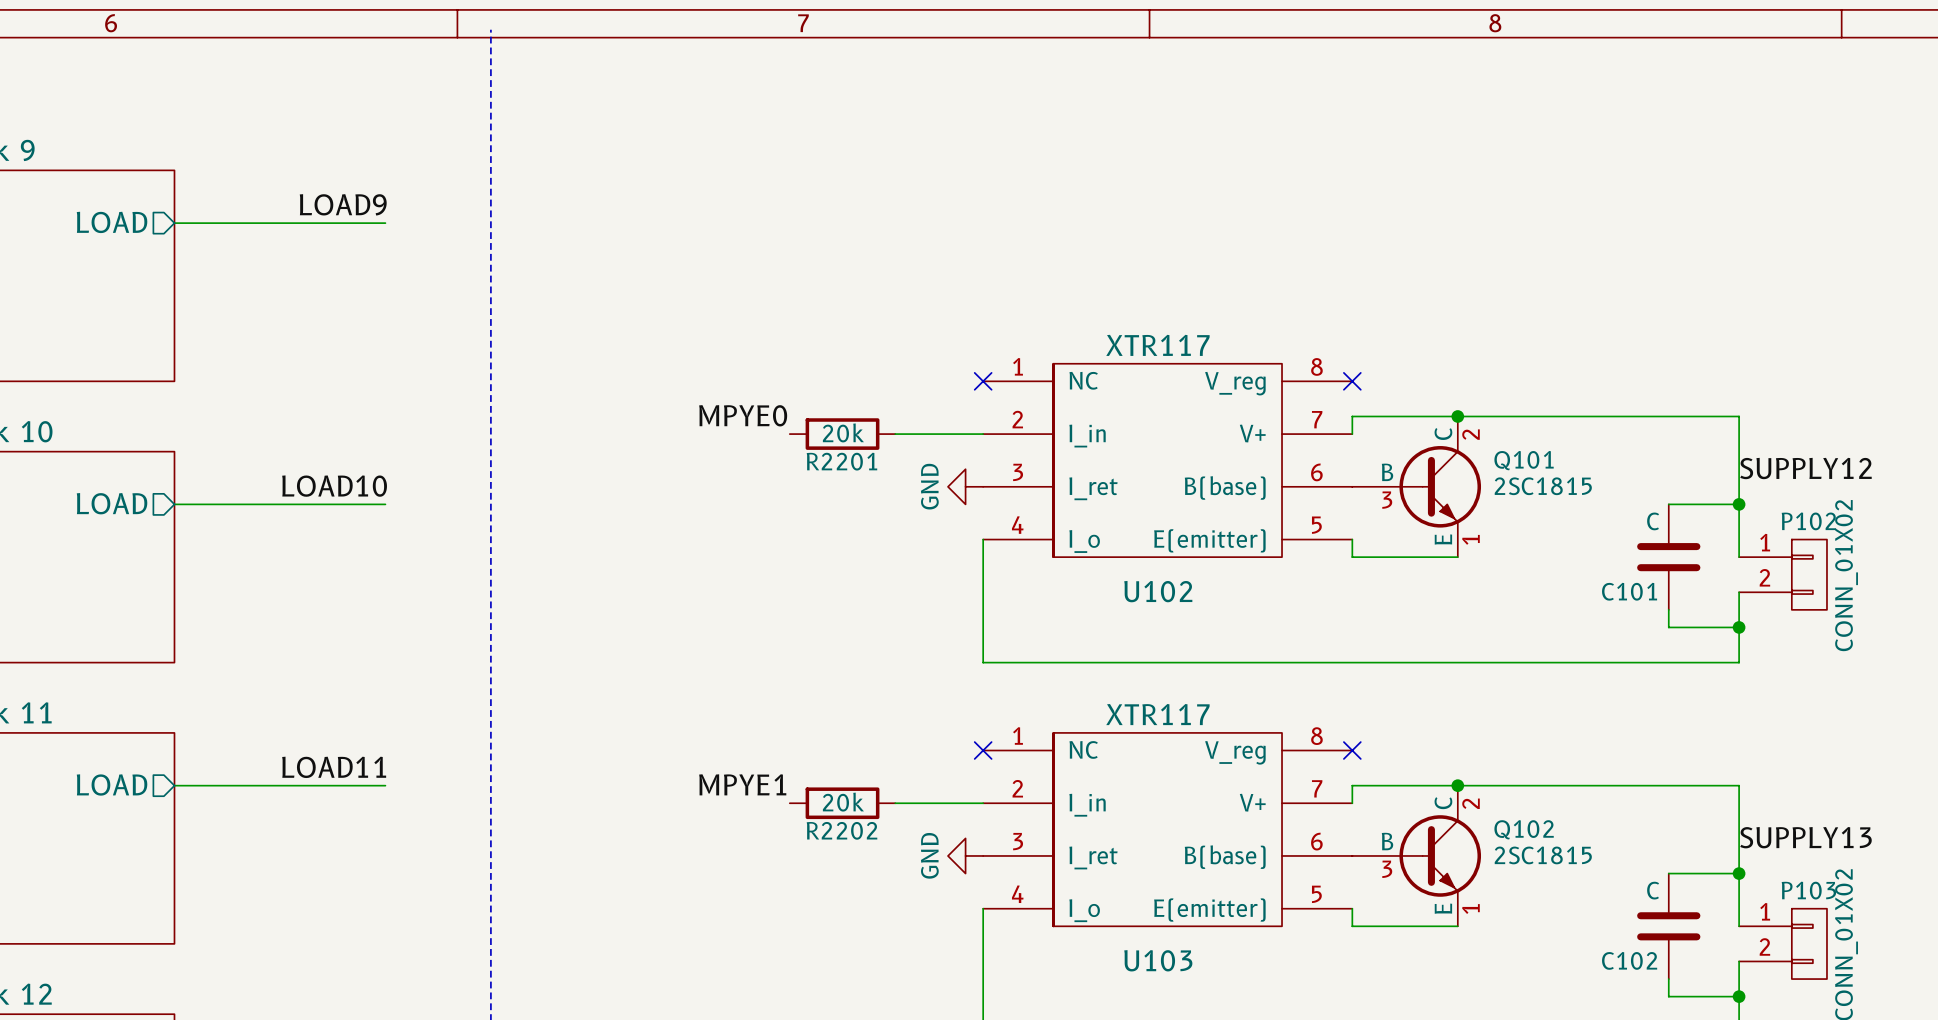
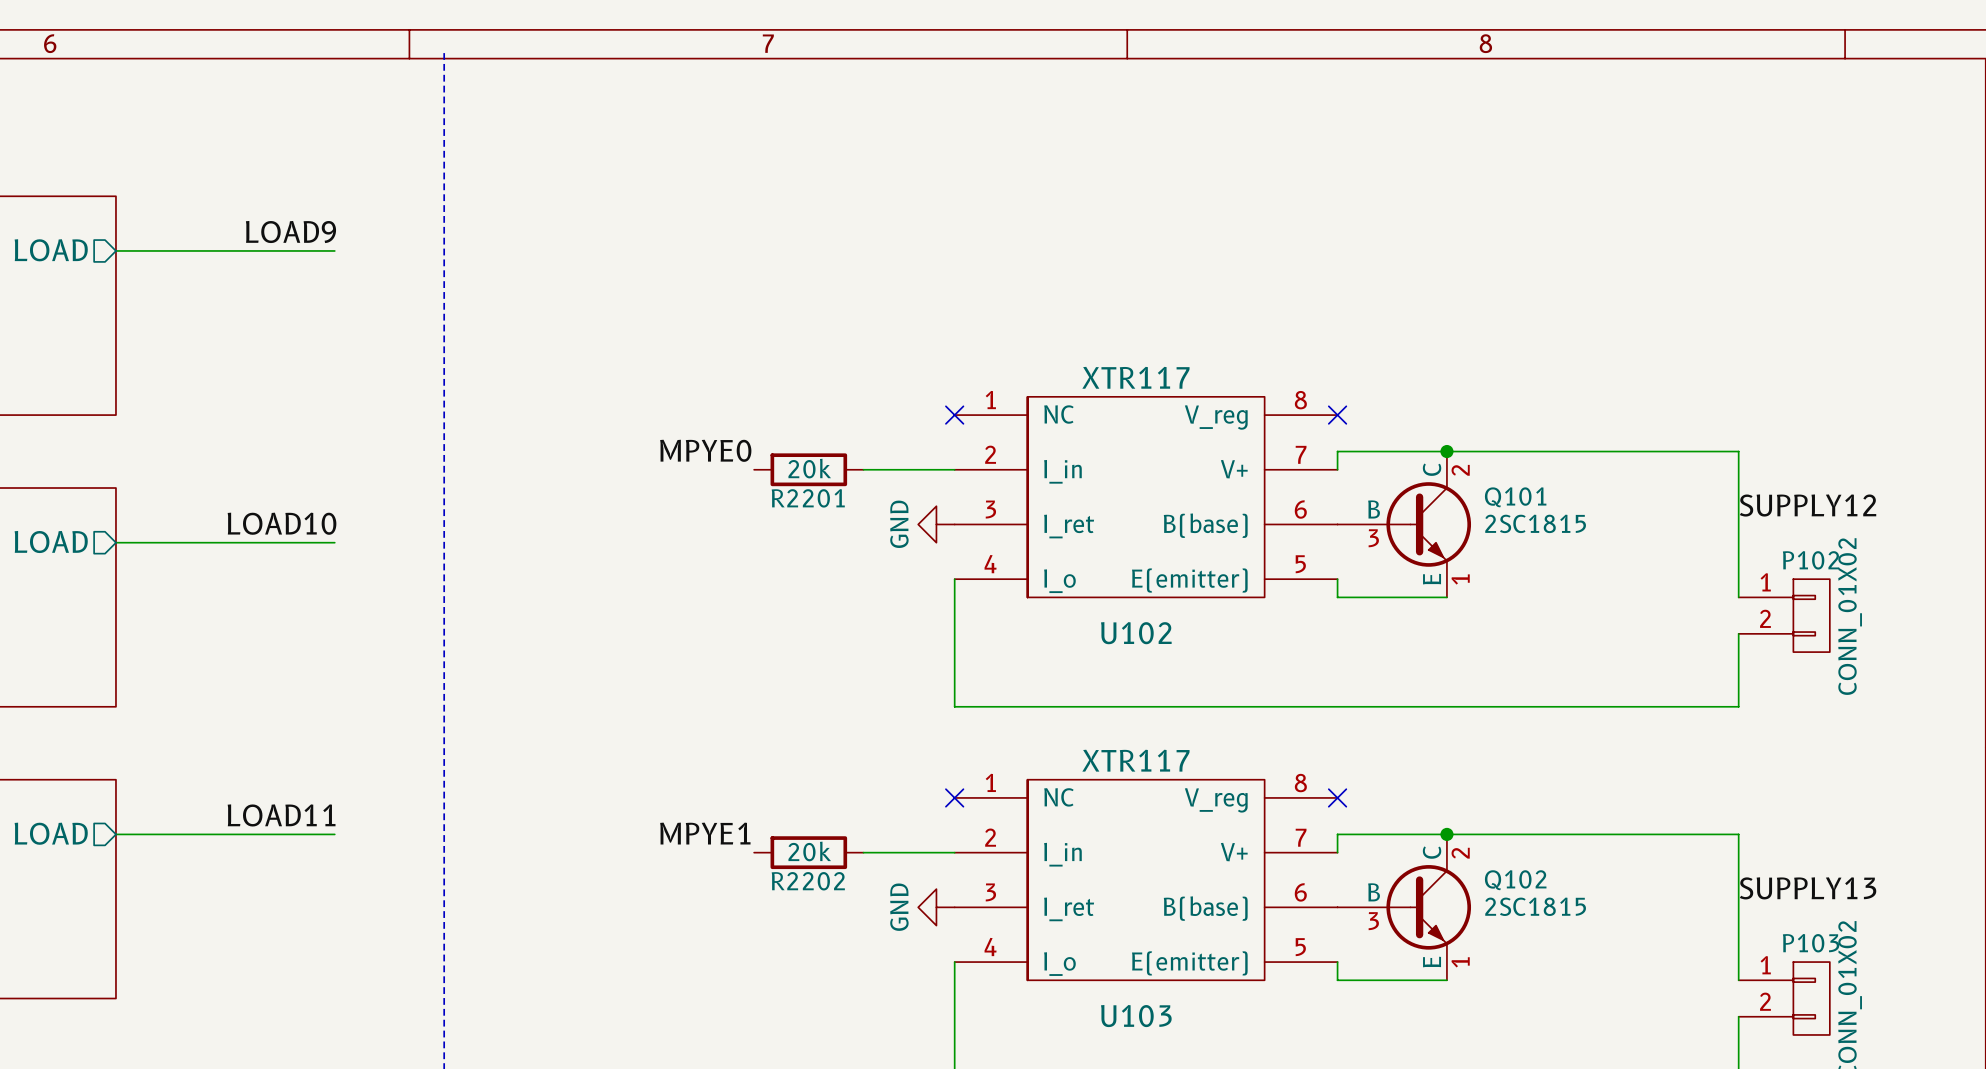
wire: (1668, 504) (1739, 504) -> none
junction: (1739, 504) -> none
C101: C (1668, 557) -> none
wire: (1668, 609) (1668, 627) (1739, 627) -> none
junction: (1739, 627) -> none
wire: (1668, 873) (1739, 873) -> none
junction: (1739, 873) -> none
C102: C (1668, 926) -> none
wire: (1668, 979) (1668, 996) (1739, 996) -> none
junction: (1739, 996) -> none

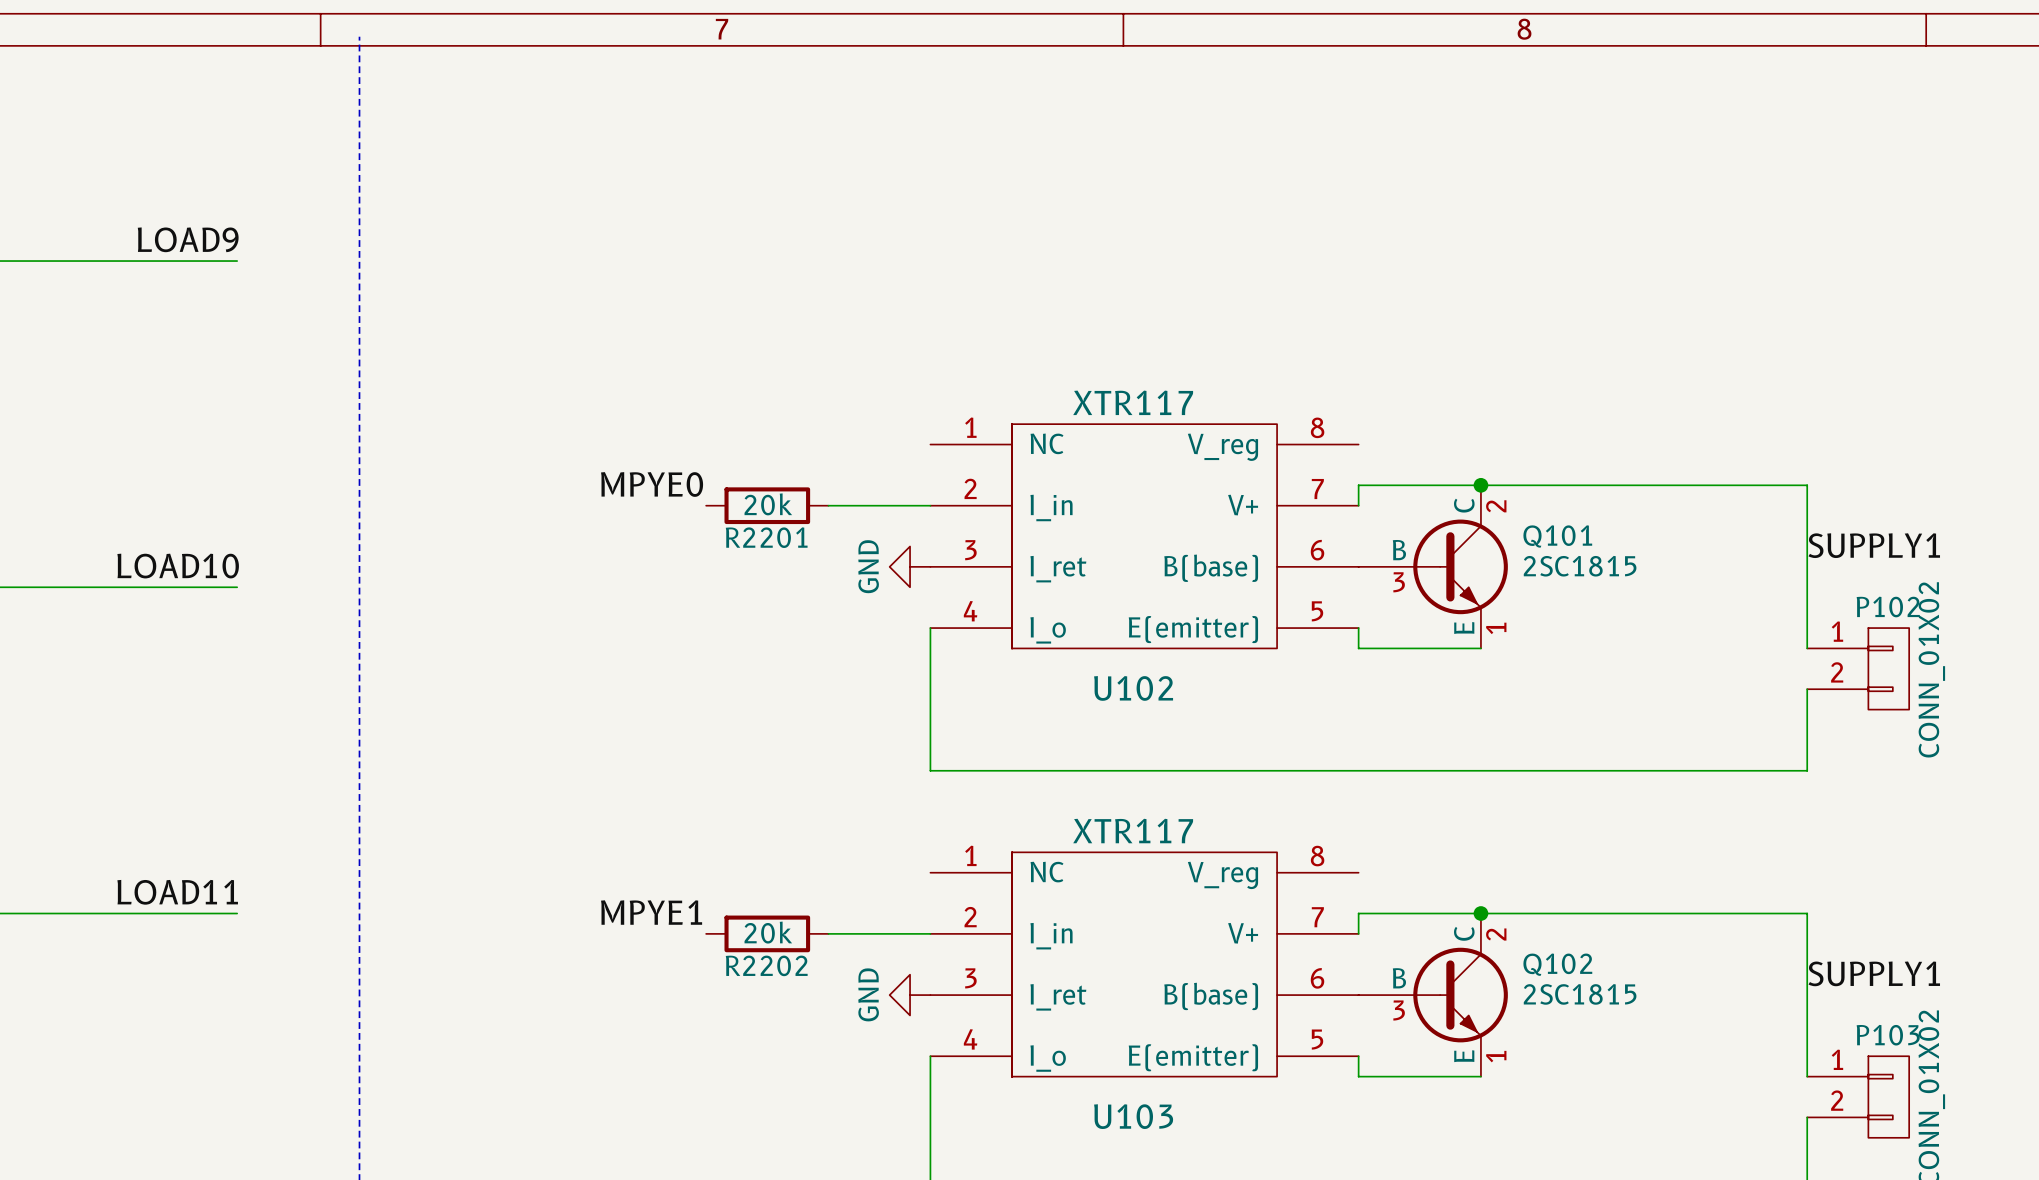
no-connect mark: (954, 415) -> none
no-connect mark: (1337, 415) -> none
label: SUPPLY12 (1808, 505) -> SUPPLY1 (1874, 545)
no-connect mark: (954, 797) -> none
no-connect mark: (1337, 797) -> none
label: SUPPLY13 (1808, 888) -> SUPPLY1 (1874, 973)

